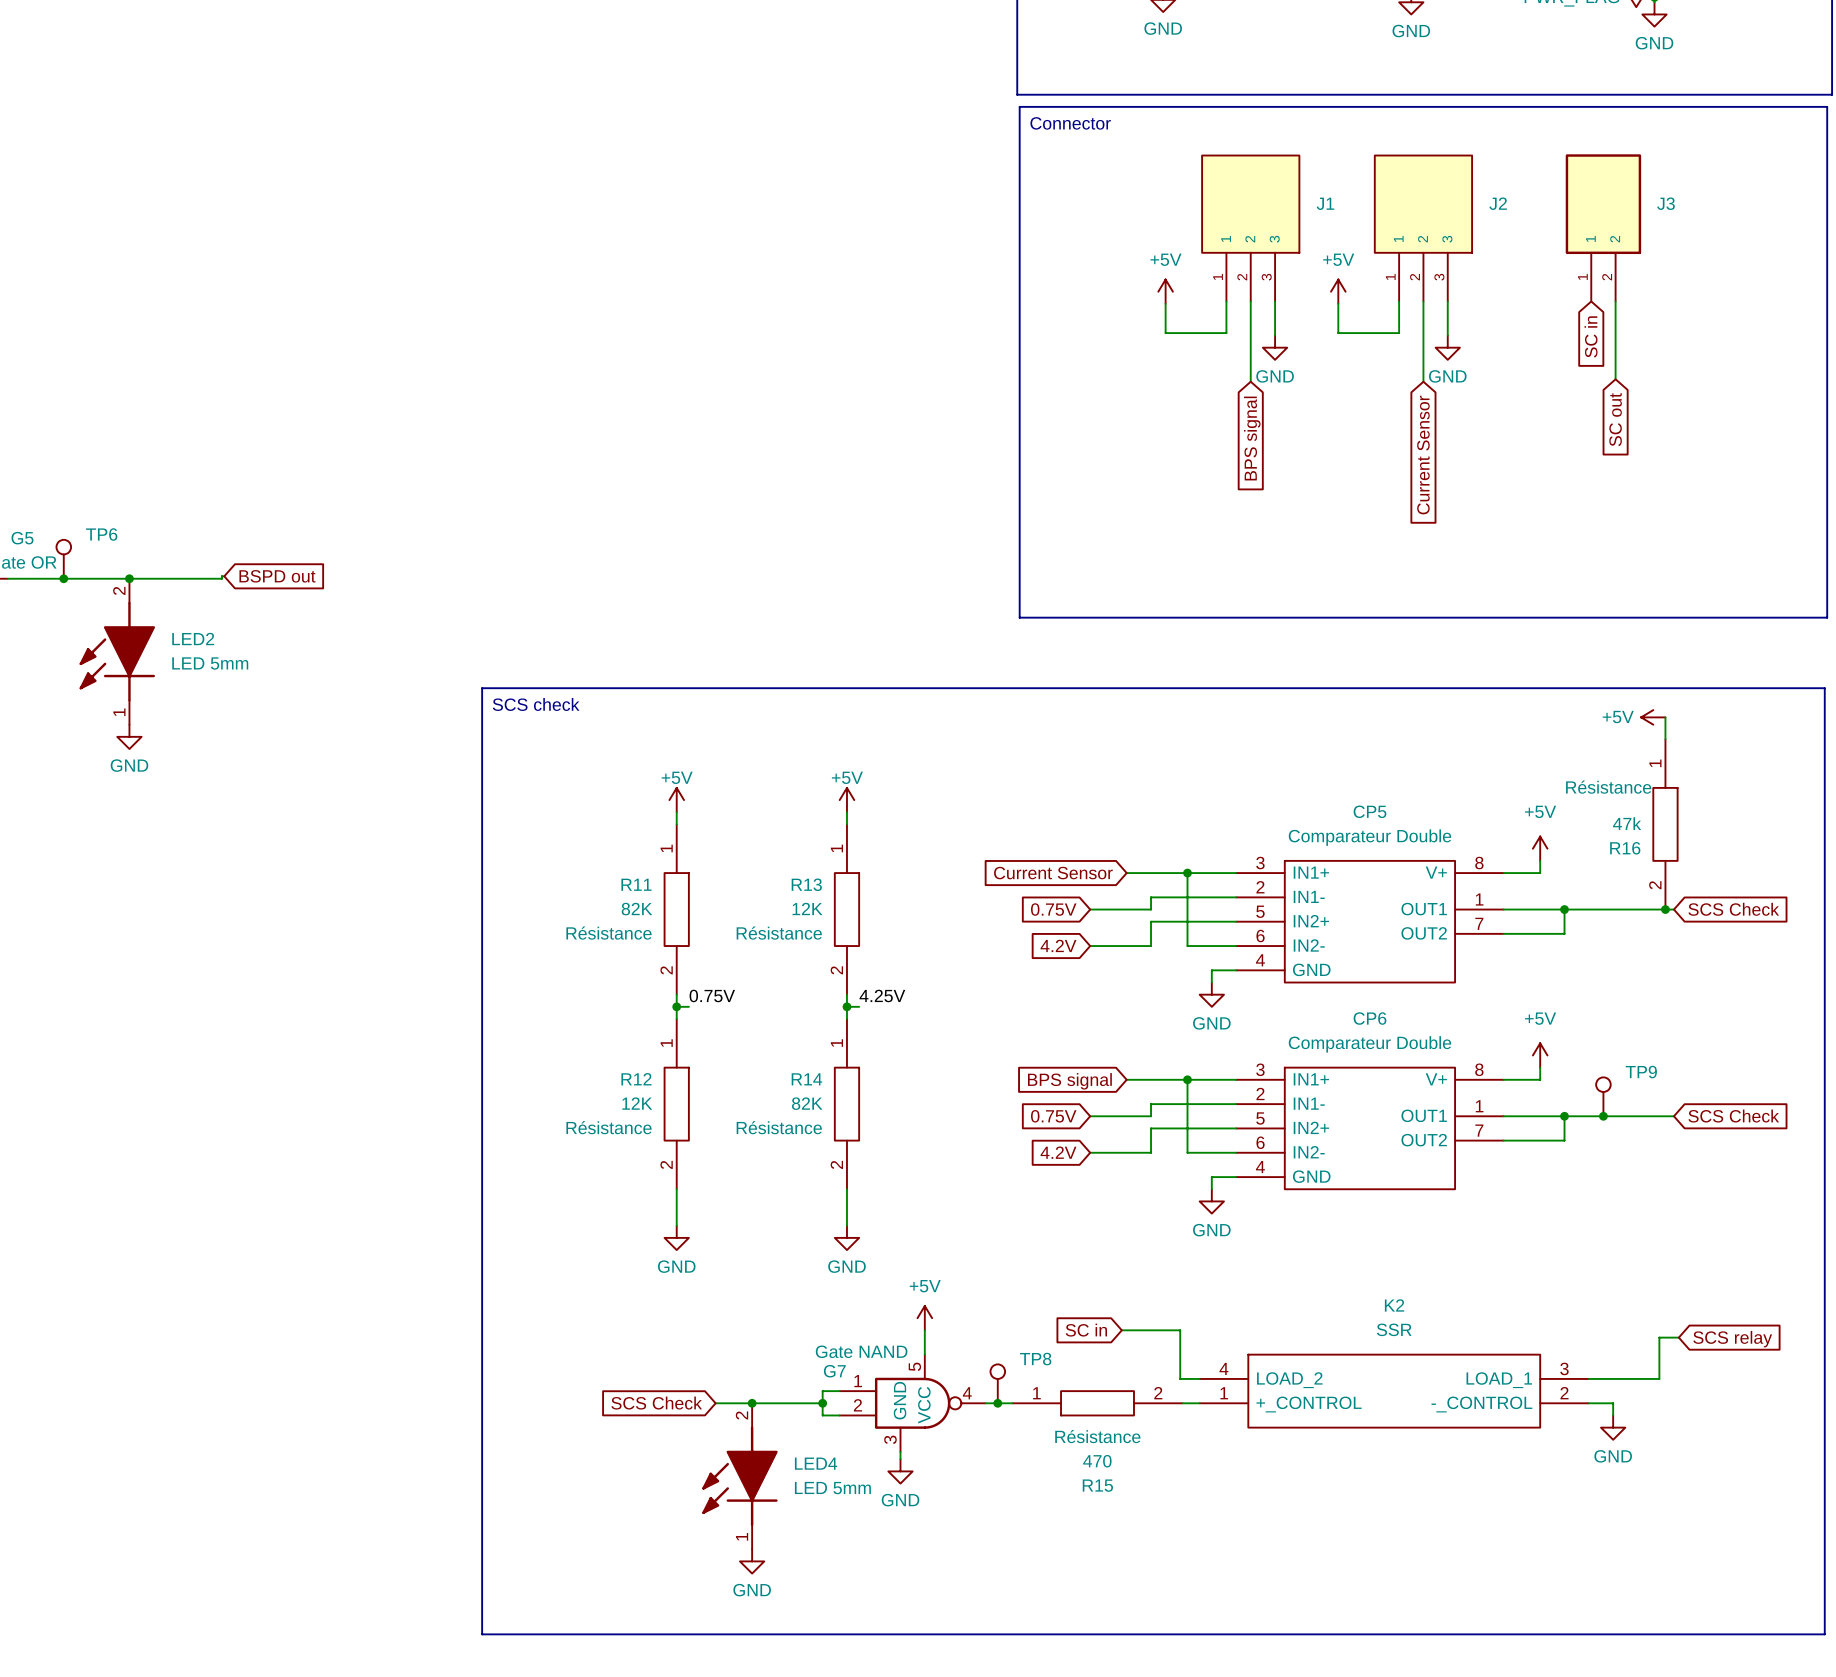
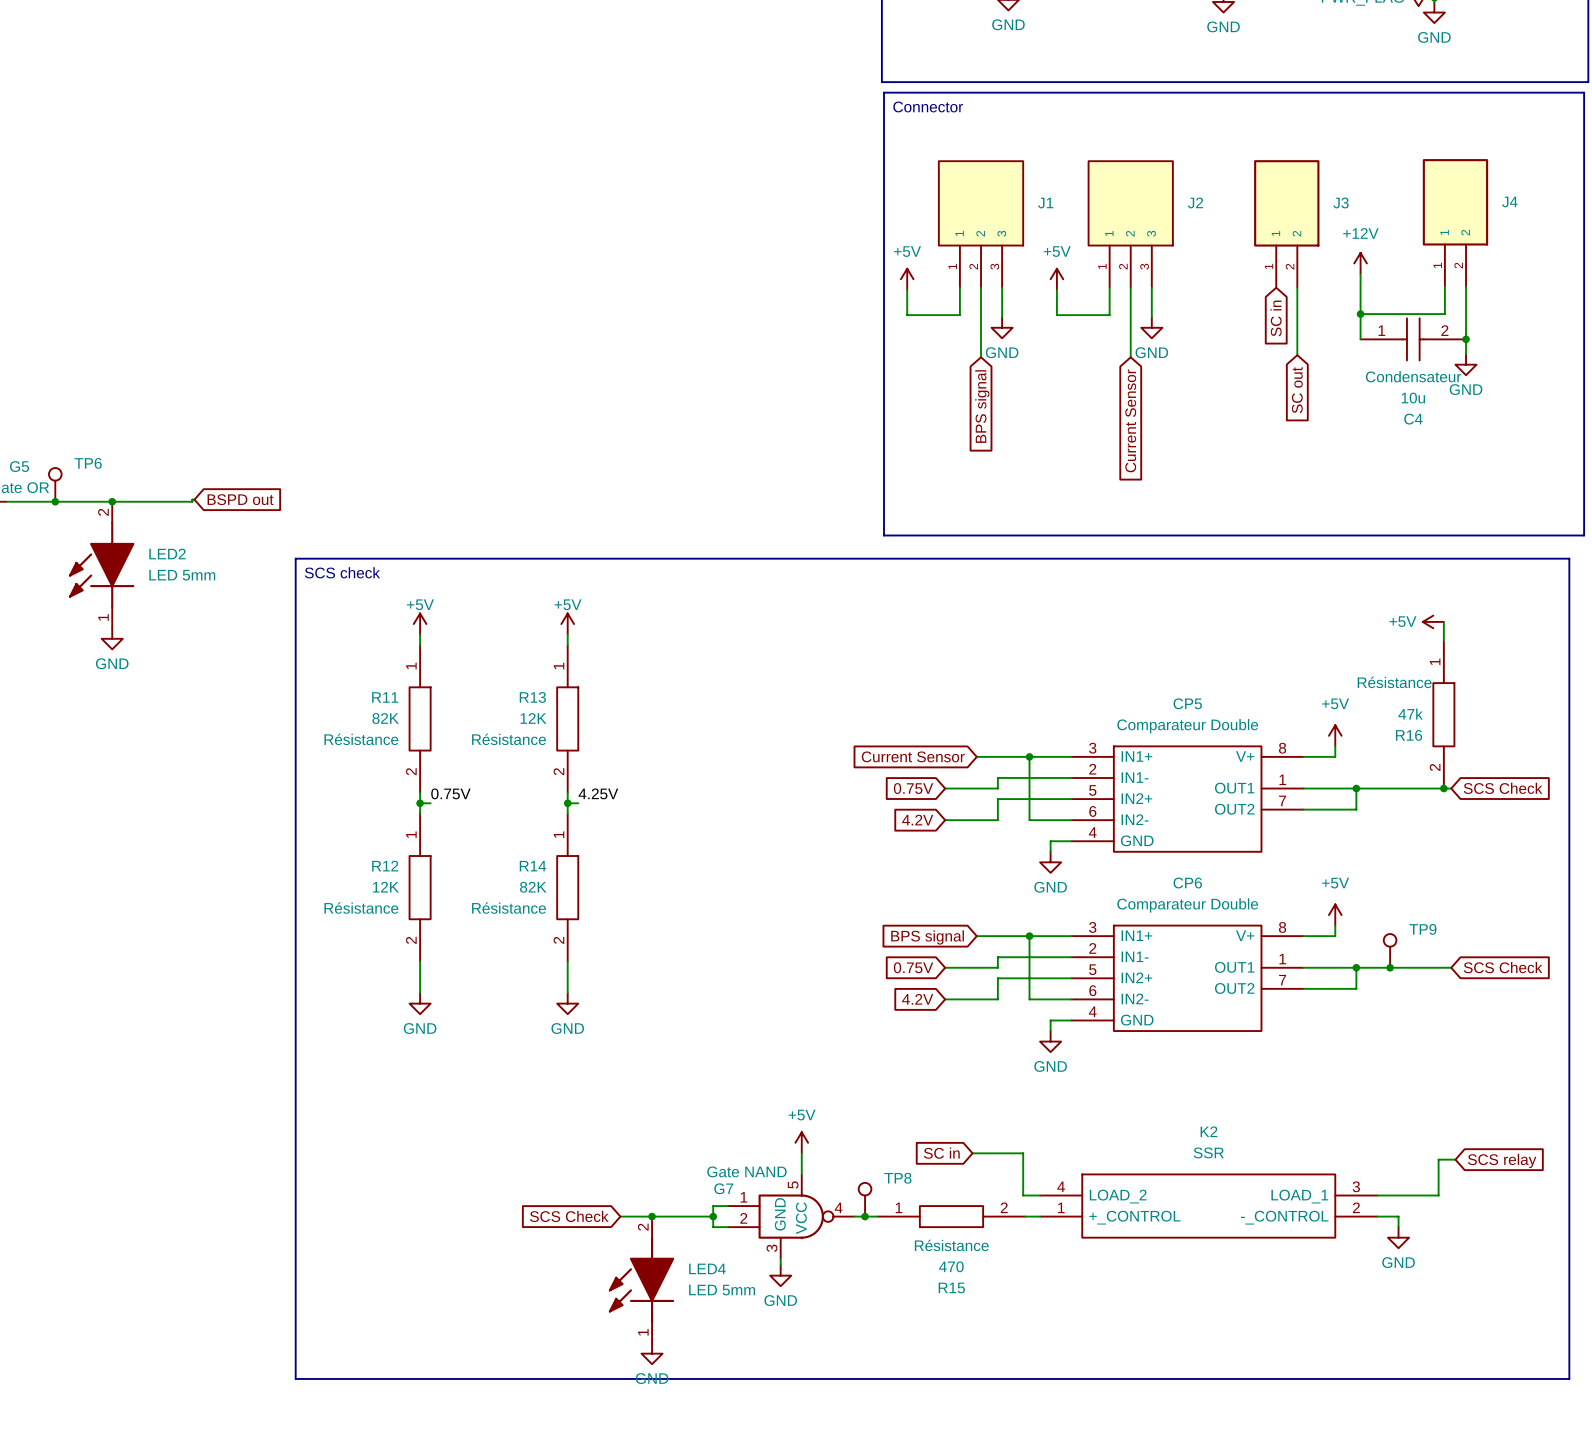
J3 position: (1603, 227) -> (1286, 223)
J1 position: (1250, 228) -> (981, 224)
J2 position: (1423, 228) -> (1130, 224)
J4: none -> (1455, 222)
power symbol: +5V (1165, 291) -> none
power symbol: +5V (1338, 291) -> none
wire: (1226, 301) (1226, 333) (1165, 333) (1165, 303) -> (959, 287) (959, 315) (907, 315) (907, 289)
wire: (1250, 301) (1250, 381) -> (981, 287) (981, 357)
wire: (1275, 301) (1275, 335) -> (1002, 287) (1002, 317)
wire: (1399, 301) (1399, 333) (1338, 333) (1338, 303) -> (1109, 287) (1109, 315) (1056, 315) (1056, 289)
wire: (1423, 301) (1423, 381) -> (1130, 287) (1130, 357)
wire: (1447, 301) (1447, 335) -> (1151, 287) (1151, 317)
wire: (1615, 301) (1615, 379) -> (1297, 287) (1297, 355)
power symbol: none -> +12V (1360, 263)
wire: none -> (1360, 274) (1360, 339)
power symbol: none -> +5V (907, 279)
power symbol: none -> +5V (1056, 279)
wire: none -> (1444, 286) (1444, 314) (1360, 314)
wire: none -> (1466, 286) (1466, 354)
global label position: SC in (1591, 336) -> SC in (1276, 318)
power symbol: GND (1275, 347) -> none
power symbol: GND (1447, 347) -> none
junction: none -> (1360, 314)
power symbol: none -> GND (1002, 327)
power symbol: none -> GND (1151, 327)
C4: none -> 10u (1413, 339)
junction: none -> (1466, 339)
global label position: SC out (1615, 419) -> SC out (1297, 390)
power symbol: none -> GND (1466, 364)
global label position: BPS signal (1252, 438) -> BPS signal (982, 406)
global label position: Current Sensor (1423, 455) -> Current Sensor (1130, 420)
line: (482, 688) (1824, 688) (1824, 1634) (482, 1634) (482, 688) -> (295, 558) (295, 1378) (1569, 1378) (1569, 558) (295, 558)
text position: SCS check (536, 704) -> SCS check (342, 572)
power symbol: none -> +5V (420, 624)
power symbol position: +5V (676, 800) -> +5V (567, 624)
power symbol: +5V (846, 800) -> none
wire: (676, 812) (676, 824) -> (420, 634) (420, 645)
wire: (846, 812) (846, 824) -> (567, 634) (567, 645)
R11 position: (676, 909) -> (420, 718)
R13 position: (846, 909) -> (567, 718)
junction: none -> (420, 803)
junction: none -> (567, 803)
wire: (676, 994) (676, 1018) -> (420, 792) (420, 813)
wire: (846, 994) (846, 1018) -> (567, 792) (567, 813)
label position: 0.75V (712, 995) -> 0.75V (450, 793)
label position: 4.25V (882, 995) -> 4.25V (598, 793)
wire: (676, 1006) (688, 1006) -> (420, 803) (430, 803)
junction: (676, 1006) -> none
wire: (846, 1006) (859, 1006) -> (567, 803) (578, 803)
junction: (846, 1006) -> none
R12 position: (676, 1104) -> (420, 887)
R14 position: (846, 1104) -> (567, 887)
power symbol: none -> GND (420, 1003)
wire: (676, 1189) (676, 1225) -> (420, 961) (420, 993)
wire: (846, 1189) (846, 1225) -> (567, 961) (567, 993)
power symbol position: GND (676, 1237) -> GND (567, 1003)
power symbol: GND (846, 1237) -> none

